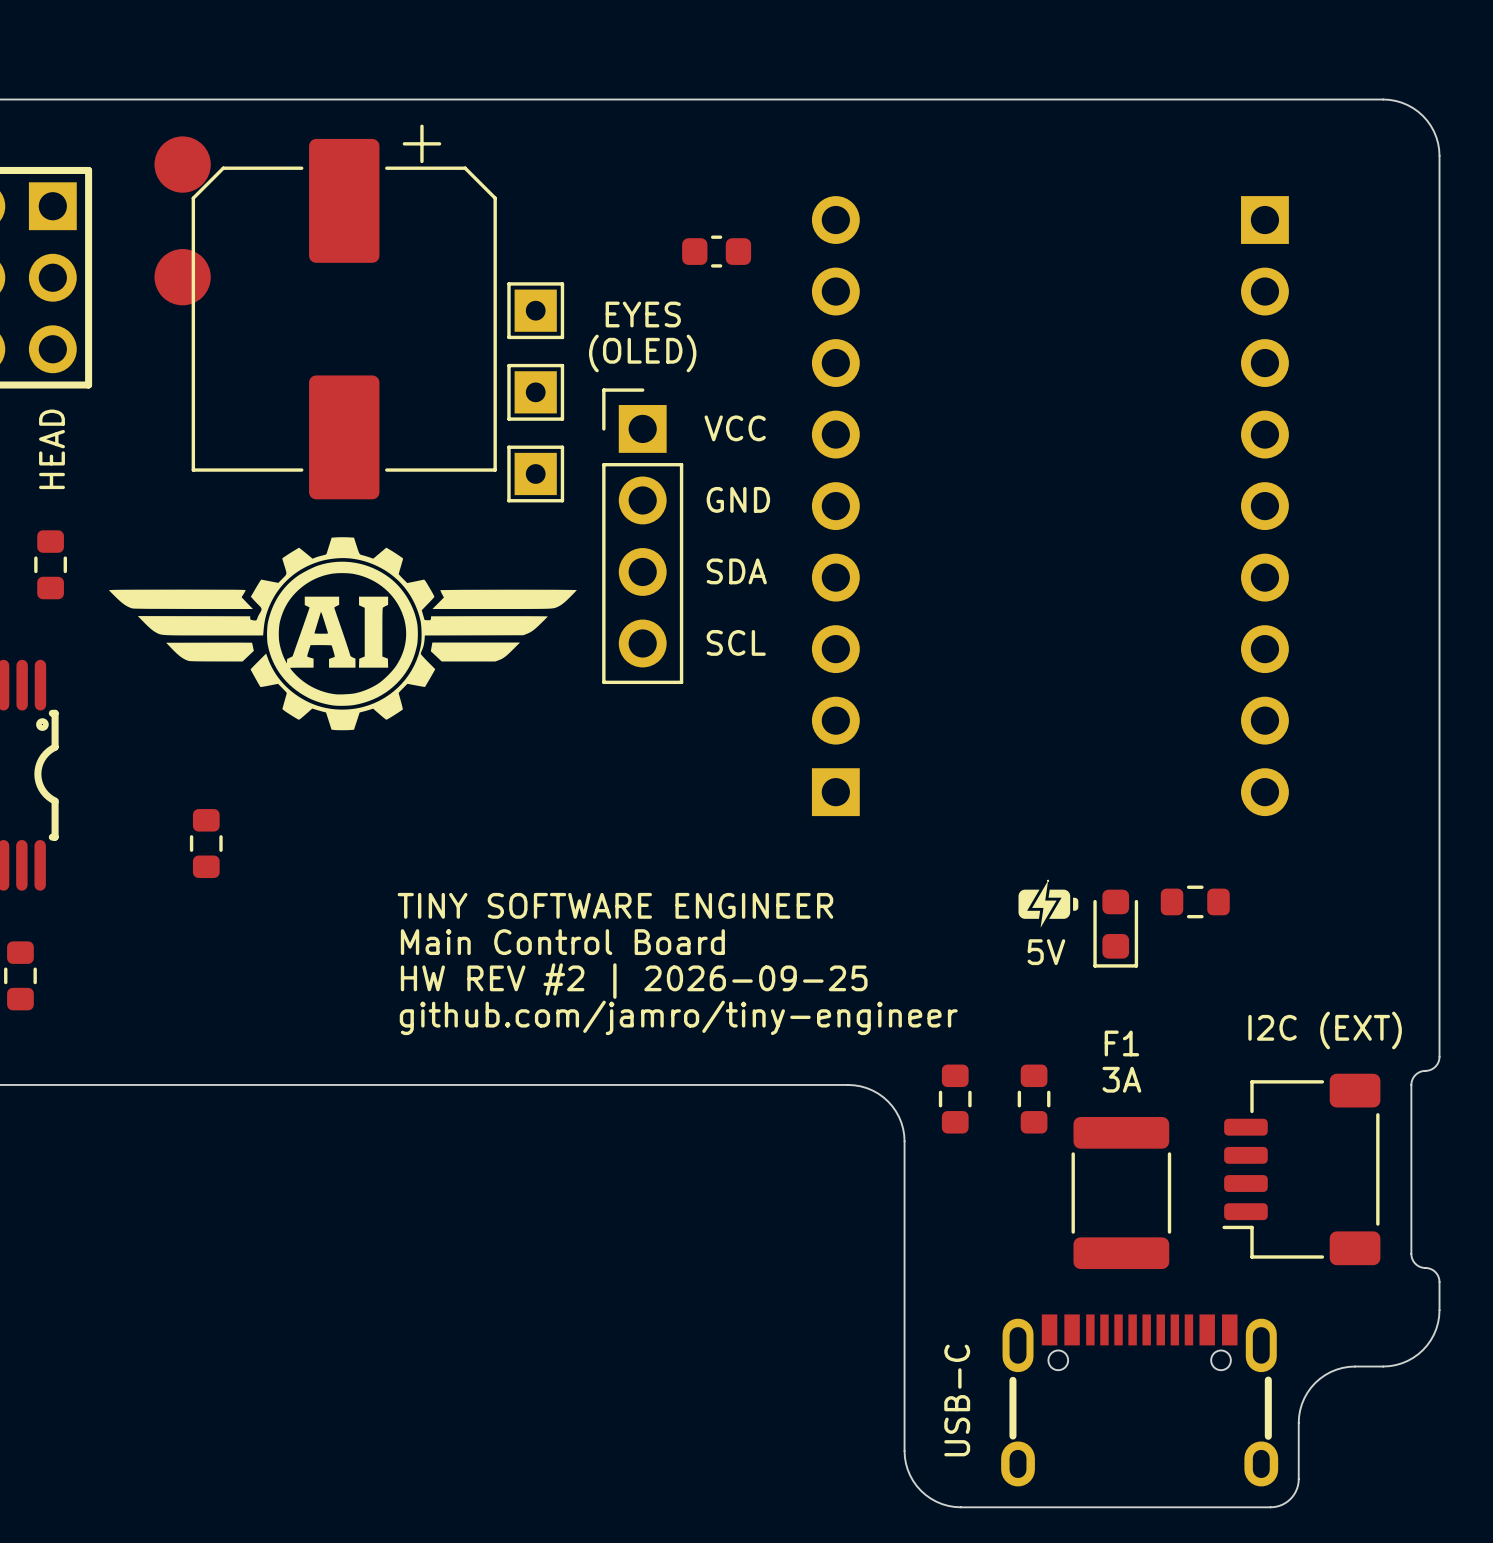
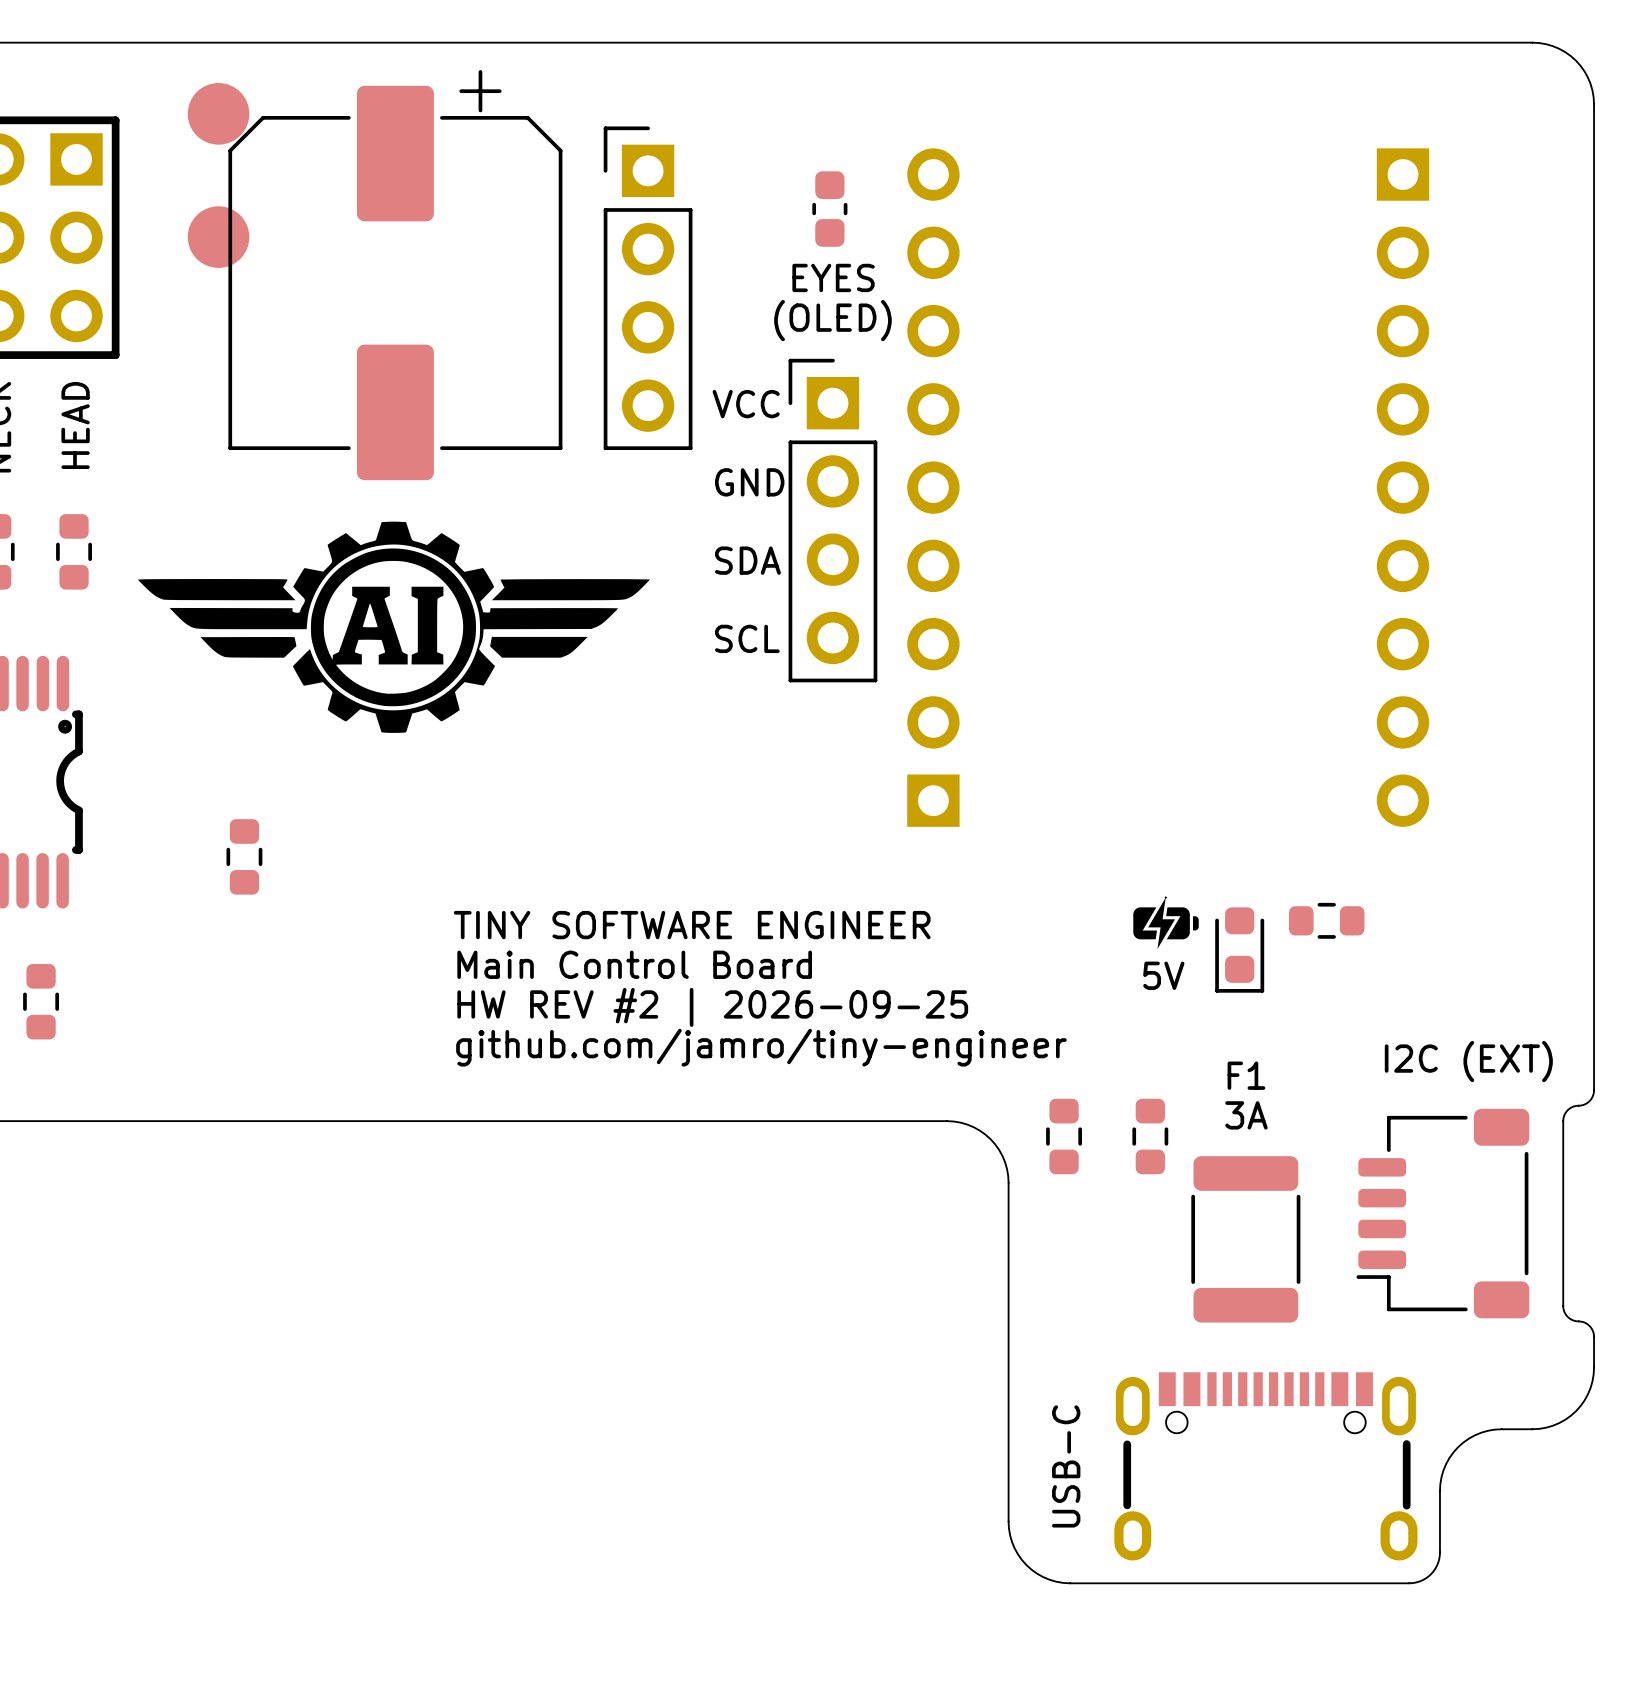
part rotation: 0° (716, 251) -> 90° clockwise (829, 209)
part: (535, 310) -> none
text position: EYES (643, 314) -> EYES (833, 277)
part: none -> (648, 288)
text position: (OLED) (642, 353) -> (OLED) (832, 320)
part: (535, 392) -> none
text position: VCC (735, 428) -> VCC (746, 404)
part: (535, 473) -> none
text position: GND (738, 499) -> GND (749, 482)
part position: (642, 536) -> (832, 520)
text position: SDA (736, 571) -> SDA (747, 560)
text position: SCL (736, 642) -> SCL (747, 638)

